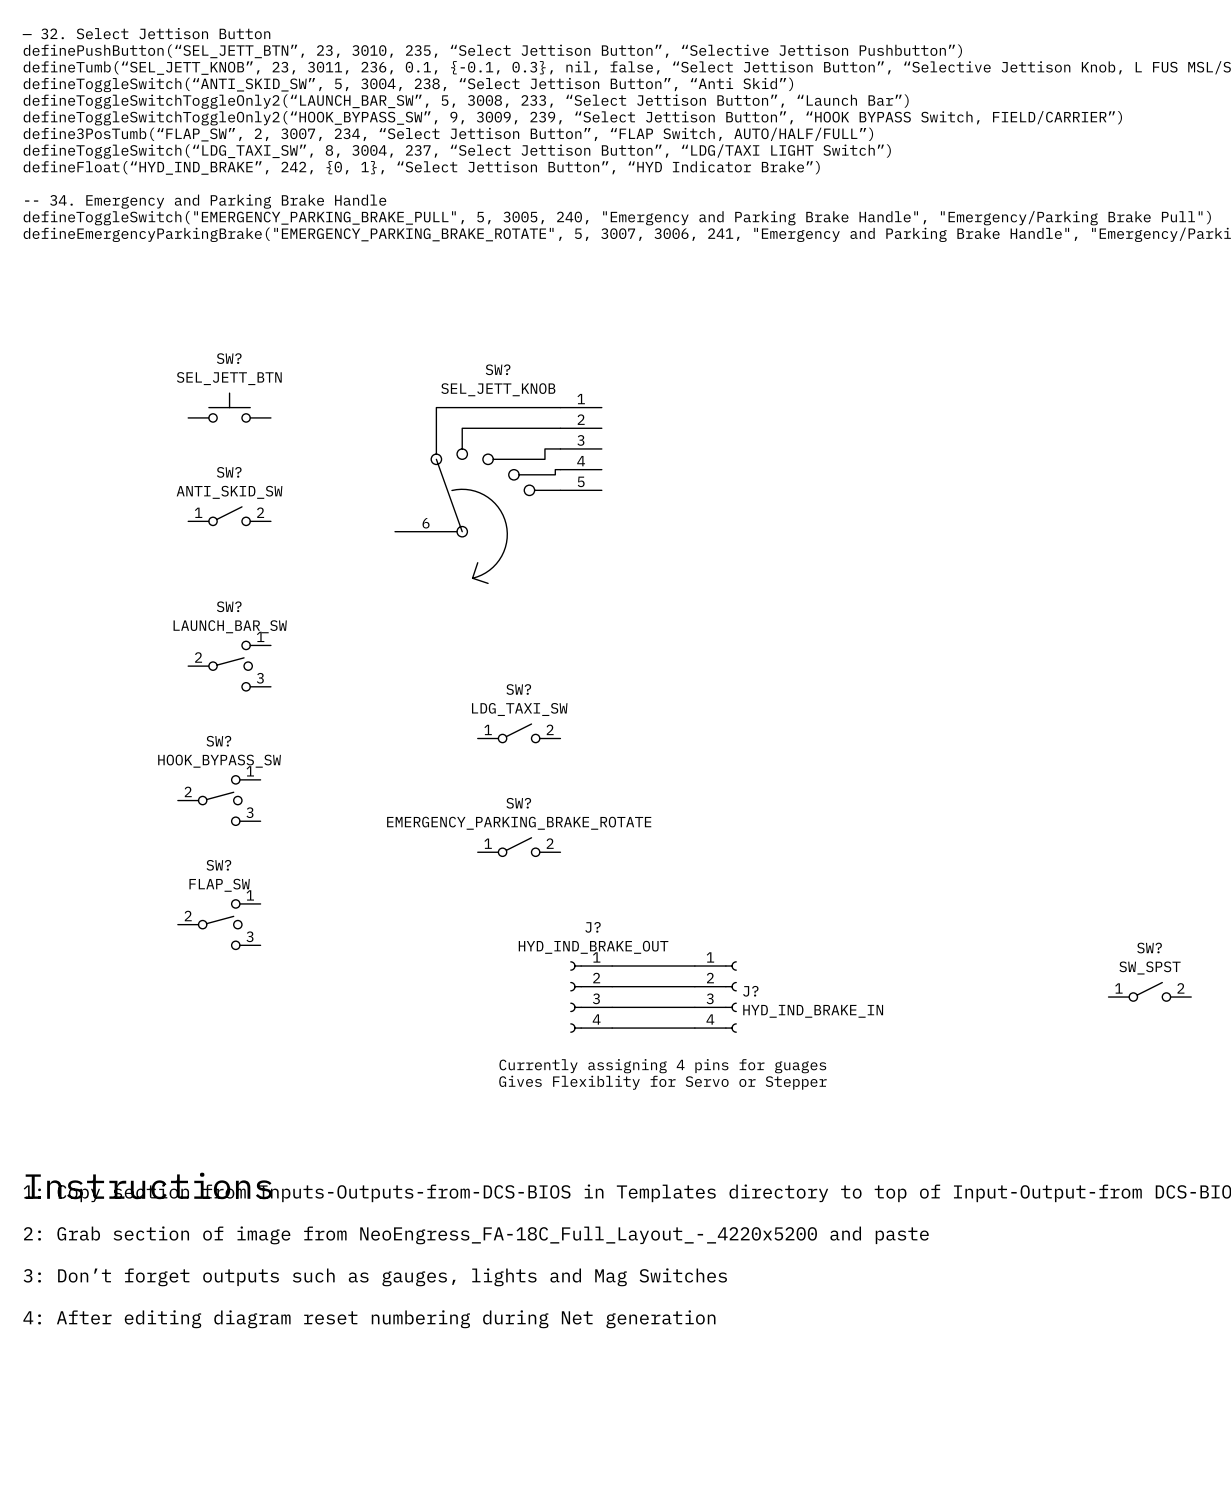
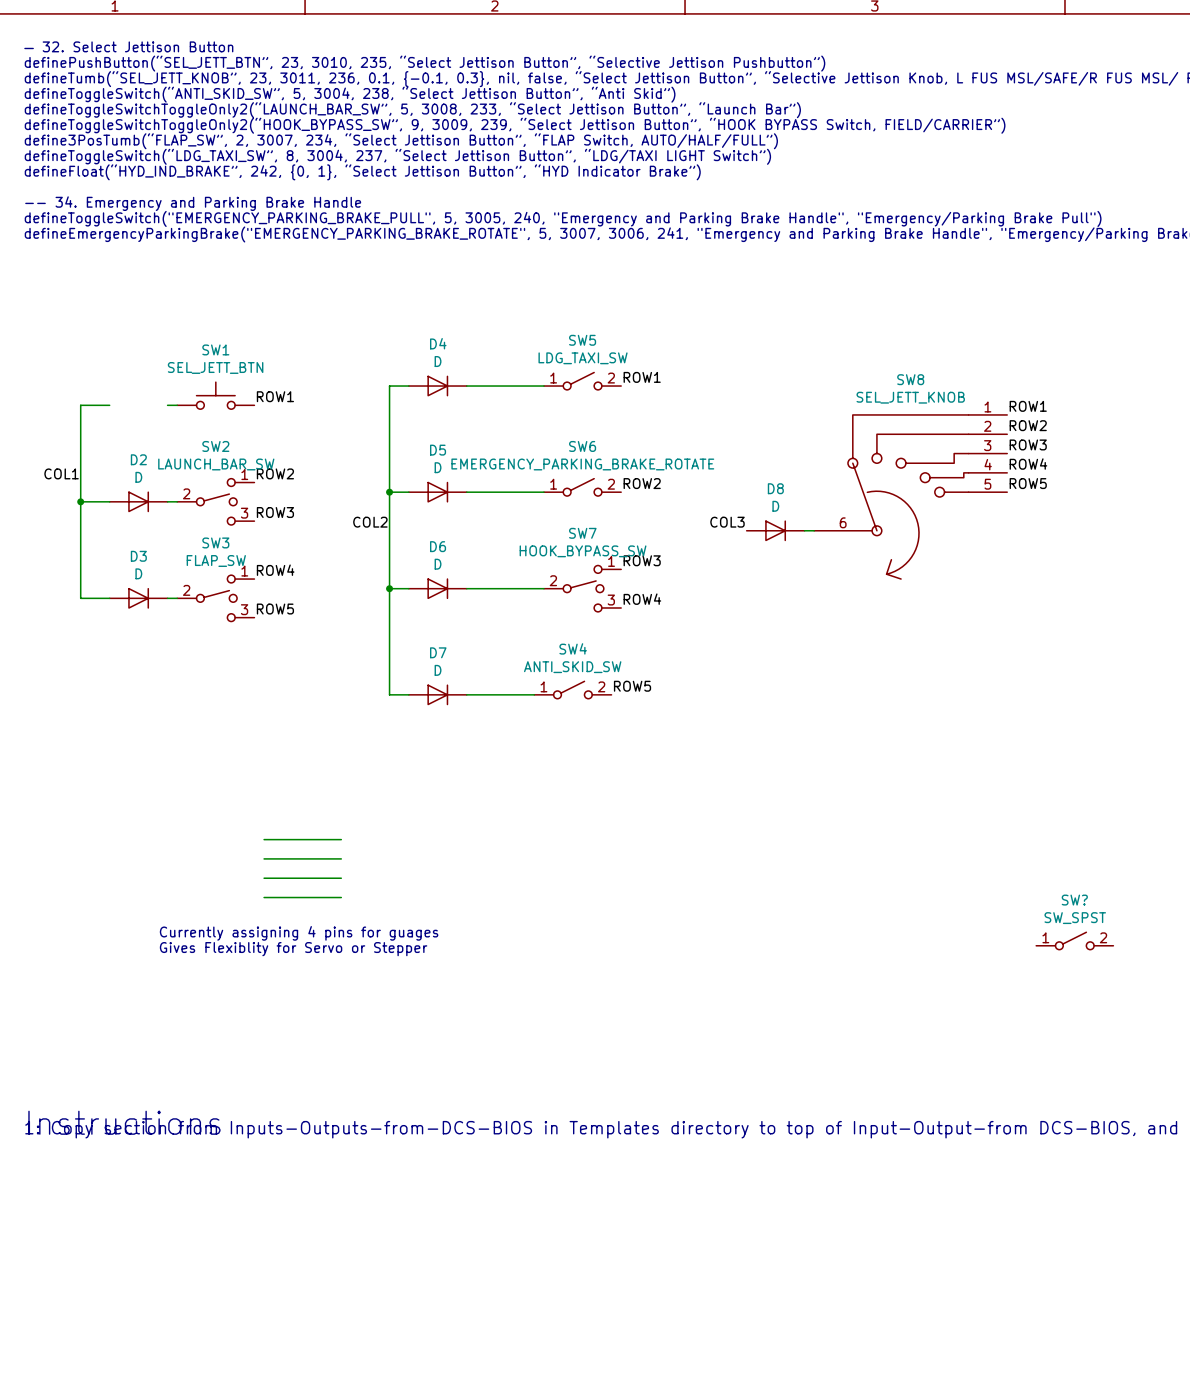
SW? name: SW? (229, 358) -> SW1 (215, 349)
label: none -> ROW1 (642, 377)
SW5: none -> LDG_TAXI_SW (582, 381)
wire: none -> (408, 386) (389, 386) (389, 694) (408, 694)
D4: none -> D (437, 386)
wire: none -> (466, 386) (543, 386)
label: none -> ROW1 (275, 396)
wire: none -> (109, 405) (80, 405) (80, 598) (109, 598)
wire: none -> (167, 405) (177, 405)
label: none -> ROW1 (1028, 406)
label: none -> ROW2 (1028, 425)
label: none -> ROW3 (1028, 444)
label: none -> ROW4 (1028, 464)
label: none -> COL1 (61, 473)
label: none -> ROW2 (275, 473)
SW?: SEL_JETT_KNOB (498, 495) -> none
label: none -> ROW2 (642, 483)
label: none -> ROW5 (1028, 483)
SW6: none -> EMERGENCY_PARKING_BRAKE_ROTATE (582, 487)
wire: none -> (389, 492) (408, 492)
junction: none -> (389, 492)
D5: none -> D (437, 492)
wire: none -> (466, 492) (543, 492)
SW?: ANTI_SKID_SW (229, 516) -> none
SW8: none -> SEL_JETT_KNOB (910, 497)
wire: none -> (80, 501) (109, 501)
junction: none -> (80, 501)
D2: none -> D (138, 501)
wire: none -> (167, 501) (177, 501)
SW2: none -> LAUNCH_BAR_SW (215, 501)
label: none -> ROW3 (275, 512)
label: none -> COL2 (370, 522)
label: none -> COL3 (727, 522)
D8: none -> D (775, 530)
wire: none -> (804, 530) (814, 530)
label: none -> ROW3 (642, 560)
label: none -> ROW4 (275, 570)
wire: none -> (389, 588) (408, 588)
junction: none -> (389, 588)
D6: none -> D (437, 588)
wire: none -> (466, 588) (543, 588)
SW7: none -> HOOK_BYPASS_SW (582, 588)
D3: none -> D (138, 598)
wire: none -> (167, 598) (177, 598)
SW3: none -> FLAP_SW (215, 598)
label: none -> ROW4 (642, 599)
label: none -> ROW5 (275, 609)
SW?: LAUNCH_BAR_SW (229, 666) -> none
label: none -> ROW5 (632, 686)
SW4: none -> ANTI_SKID_SW (572, 690)
D7: none -> D (437, 694)
wire: none -> (466, 694) (534, 694)
SW?: LDG_TAXI_SW (519, 733) -> none
SW?: HOOK_BYPASS_SW (219, 800) -> none
SW?: EMERGENCY_PARKING_BRAKE_ROTATE (519, 847) -> none
wire: none -> (264, 839) (341, 839)
wire: none -> (264, 858) (341, 858)
SW?: FLAP_SW (219, 924) -> none
wire: none -> (264, 878) (341, 878)
wire: none -> (264, 897) (341, 897)
wire: (612, 966) (694, 966) -> none
text: none -> Currently assigning 4 pins for guages (299, 933)
wire: (612, 986) (694, 986) -> none
J?: HYD_IND_BRAKE_OUT (591, 997) -> none
J?: HYD_IND_BRAKE_IN (715, 997) -> none
text: none -> Gives Flexiblity for Servo or Stepper (293, 949)
wire: (612, 1007) (694, 1007) -> none
wire: (612, 1028) (694, 1028) -> none
text: Currently assigning 4 pins for guages (662, 1066) -> none
text: Gives Flexiblity for Servo or Stepper (662, 1082) -> none
text: 2: Grab section of image from NeoEngress_FA-18C_Full_Layout_-_4220x5200 and paste (476, 1235) -> none
text: 3: Don’t forget outputs such as gauges, lights and Mag Switches (375, 1277) -> none
text: 4: After editing diagram reset numbering during Net generation (369, 1319) -> none

